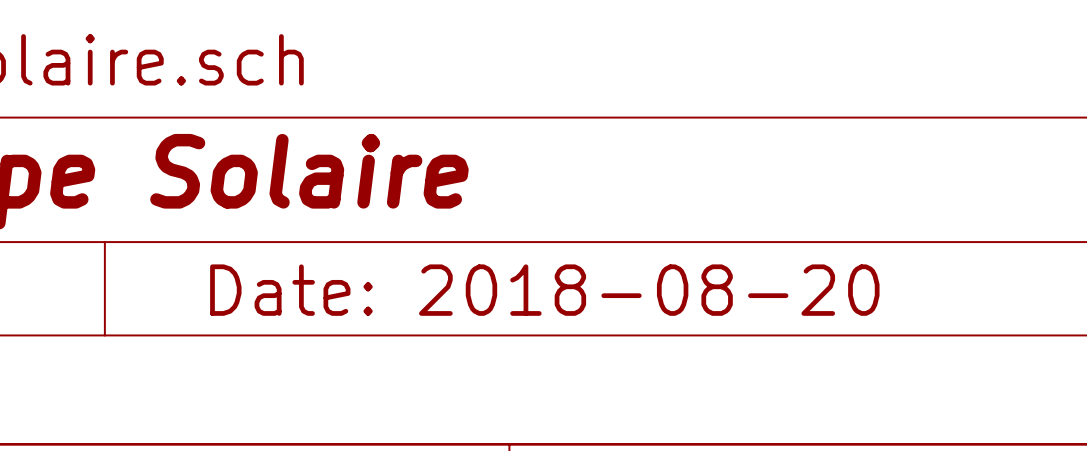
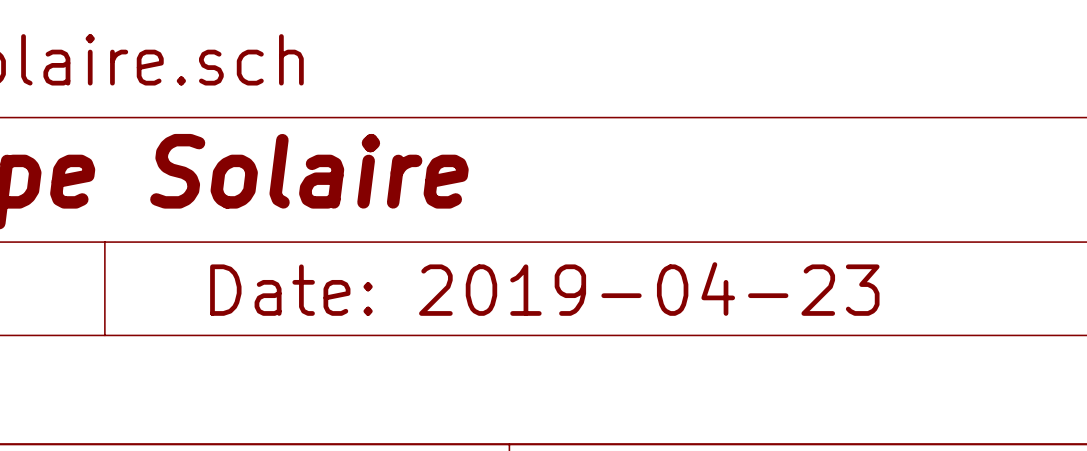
title block: Date: 2018-08-20 (544, 290) -> Date: 2019-04-23 (544, 289)

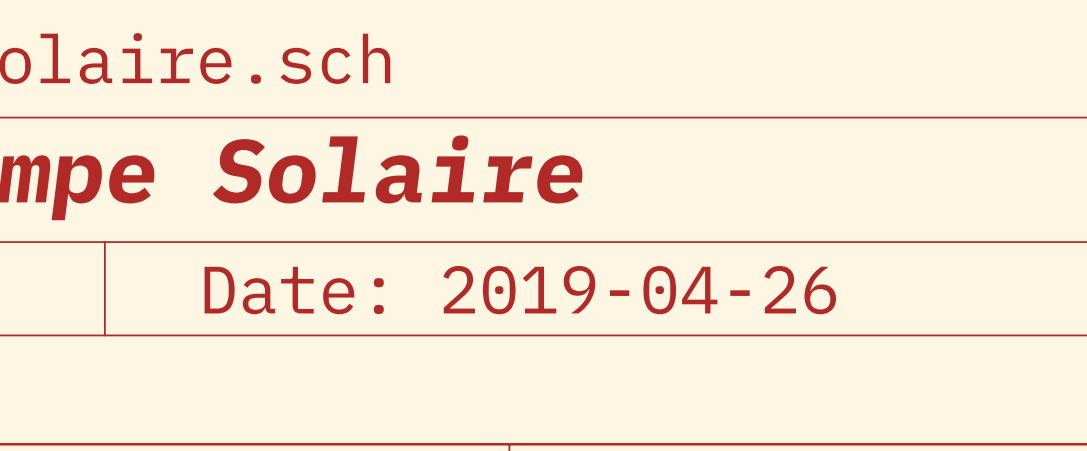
title block: Date: 2019-04-23 (544, 289) -> Date: 2019-04-26 (520, 290)

